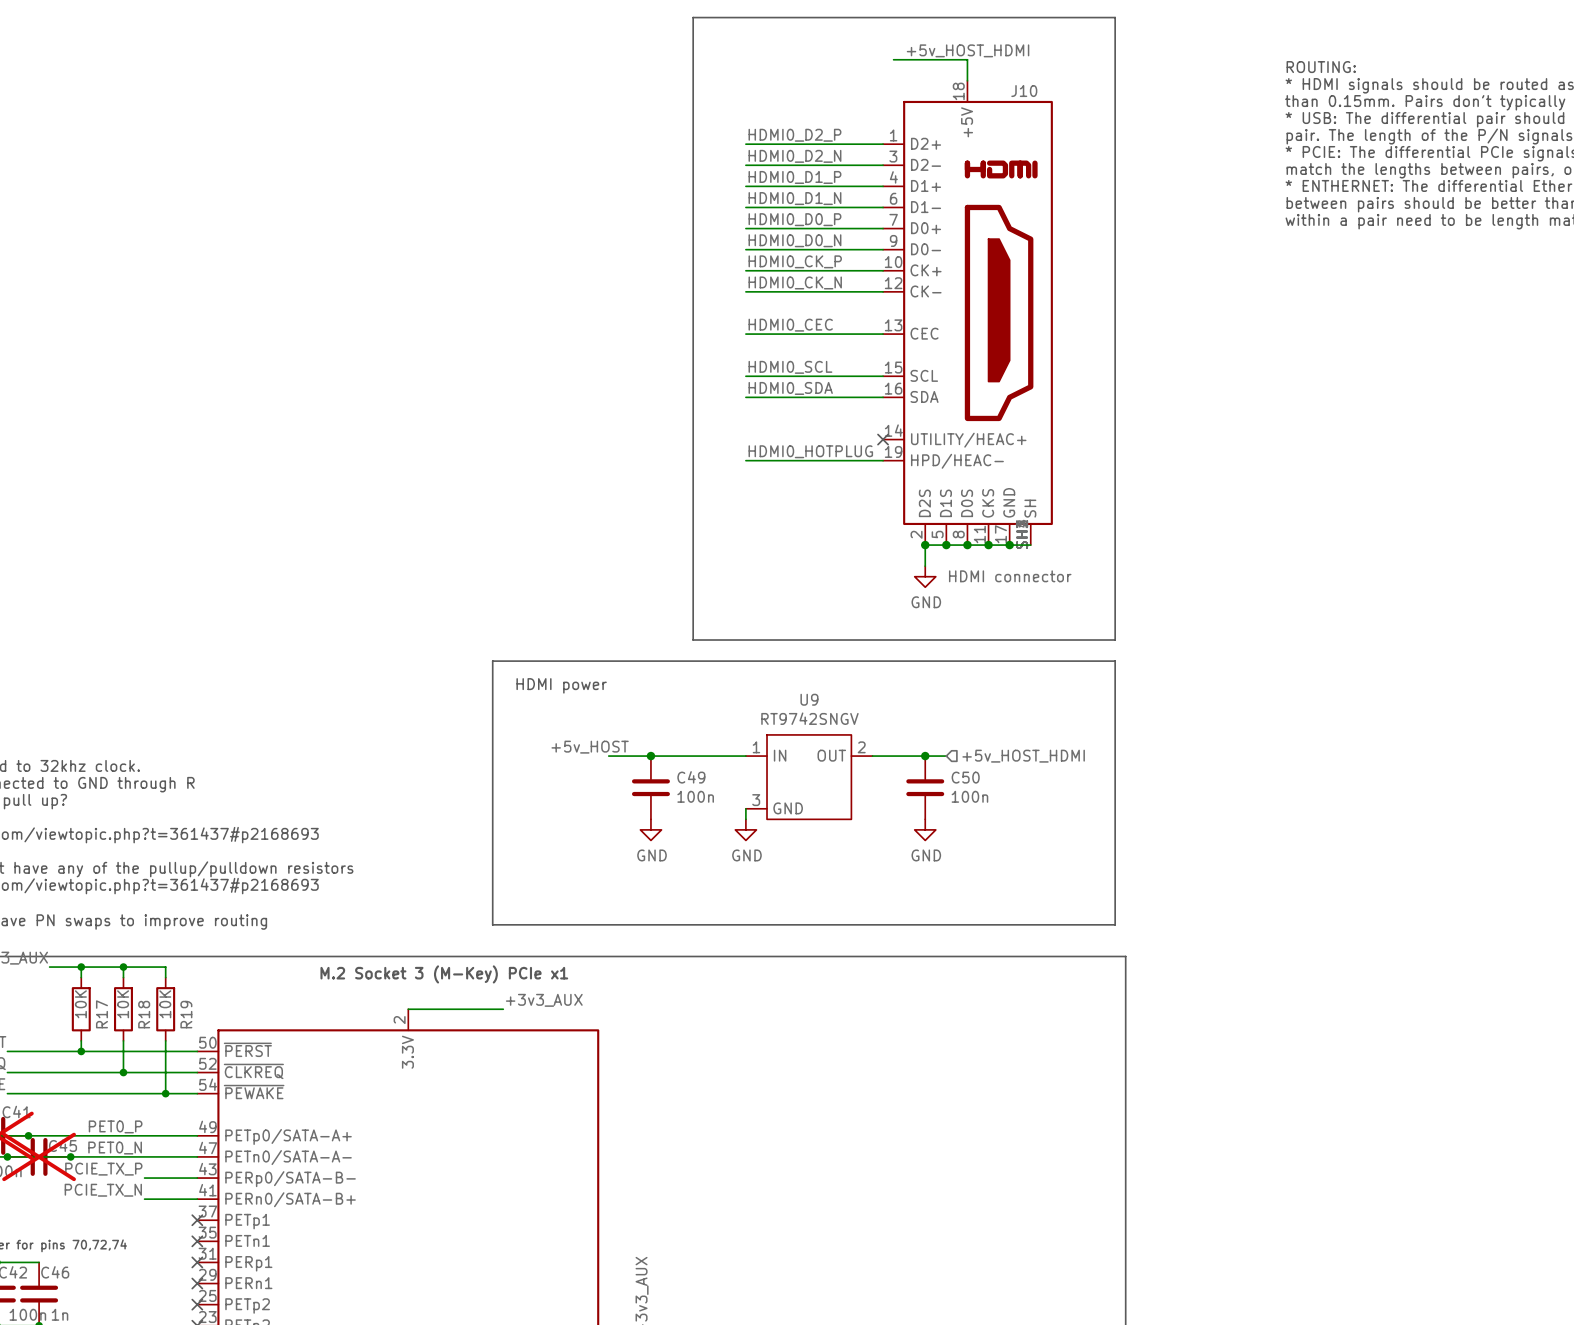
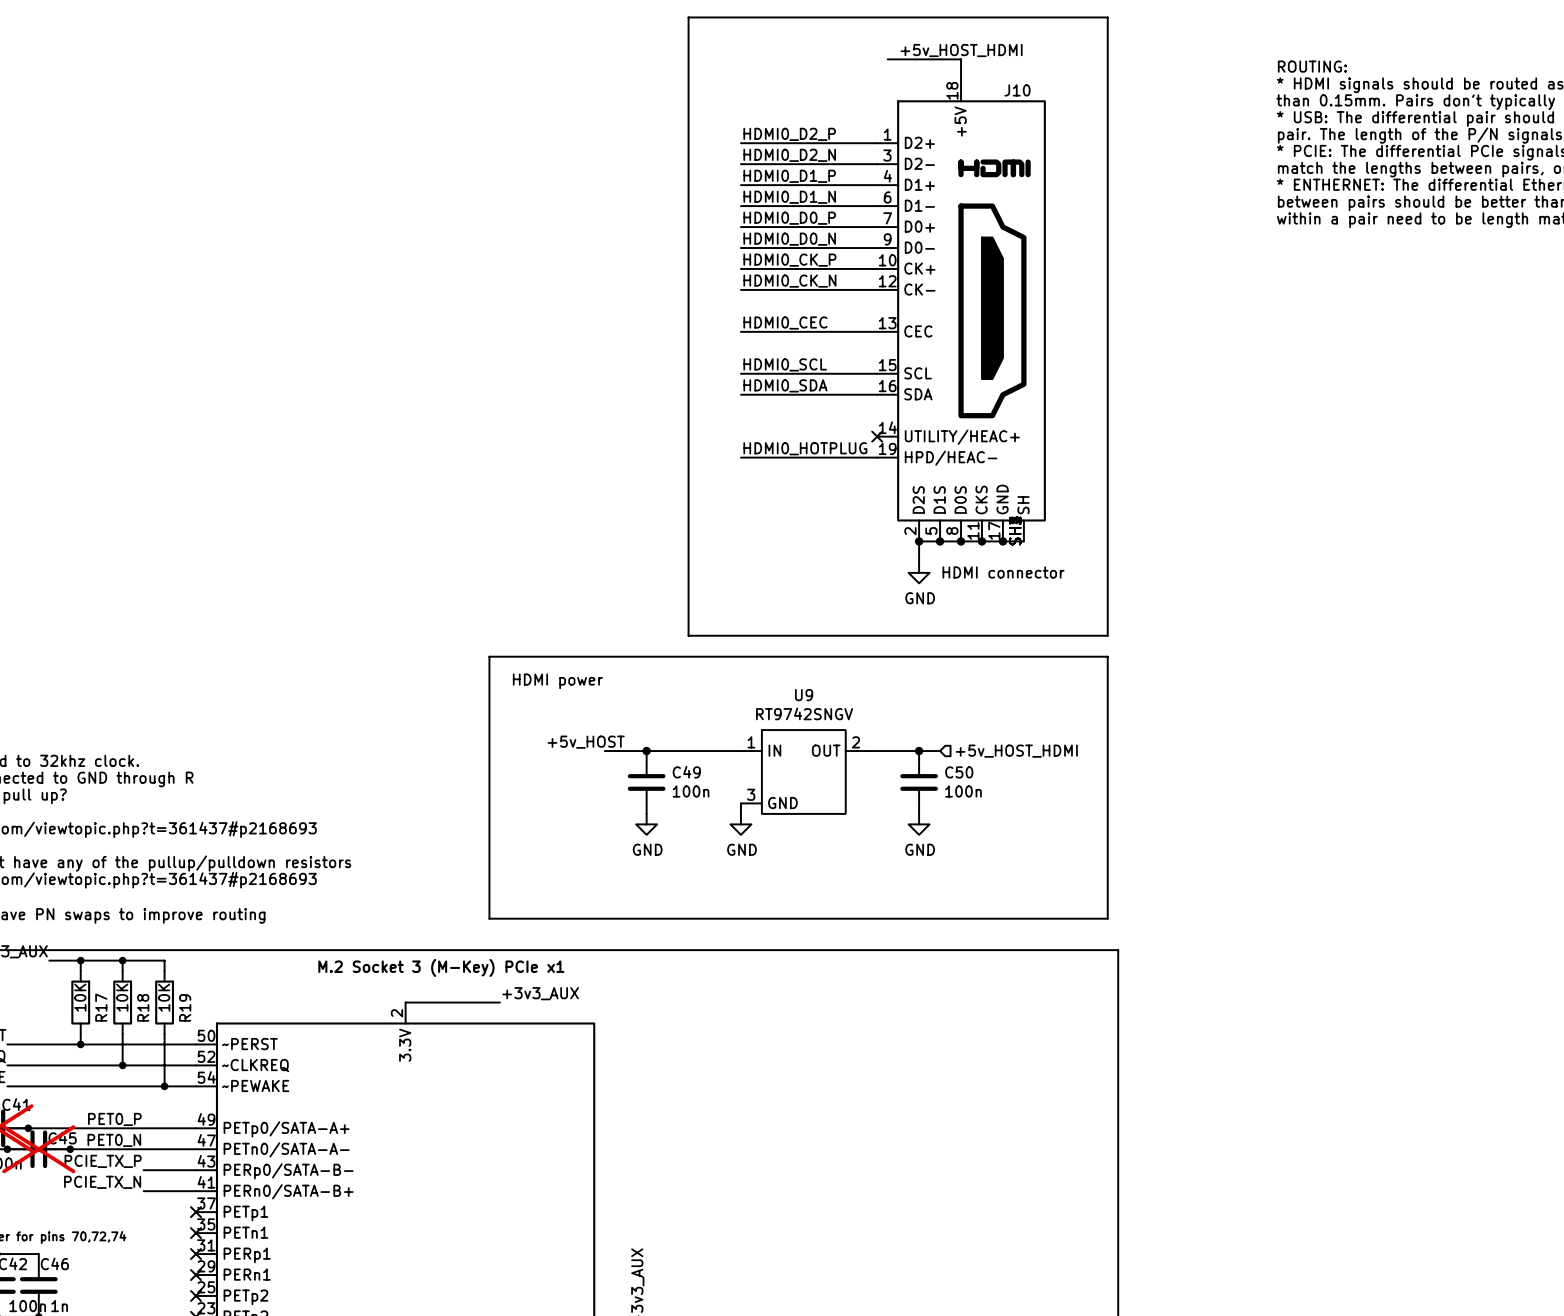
part pin name: ~{PERST} (247, 1049) -> ~PERST (249, 1044)
part pin name: ~{CLKREQ} (253, 1071) -> ~CLKREQ (255, 1065)
part pin name: ~{PEWAKE} (254, 1092) -> ~PEWAKE (255, 1085)

